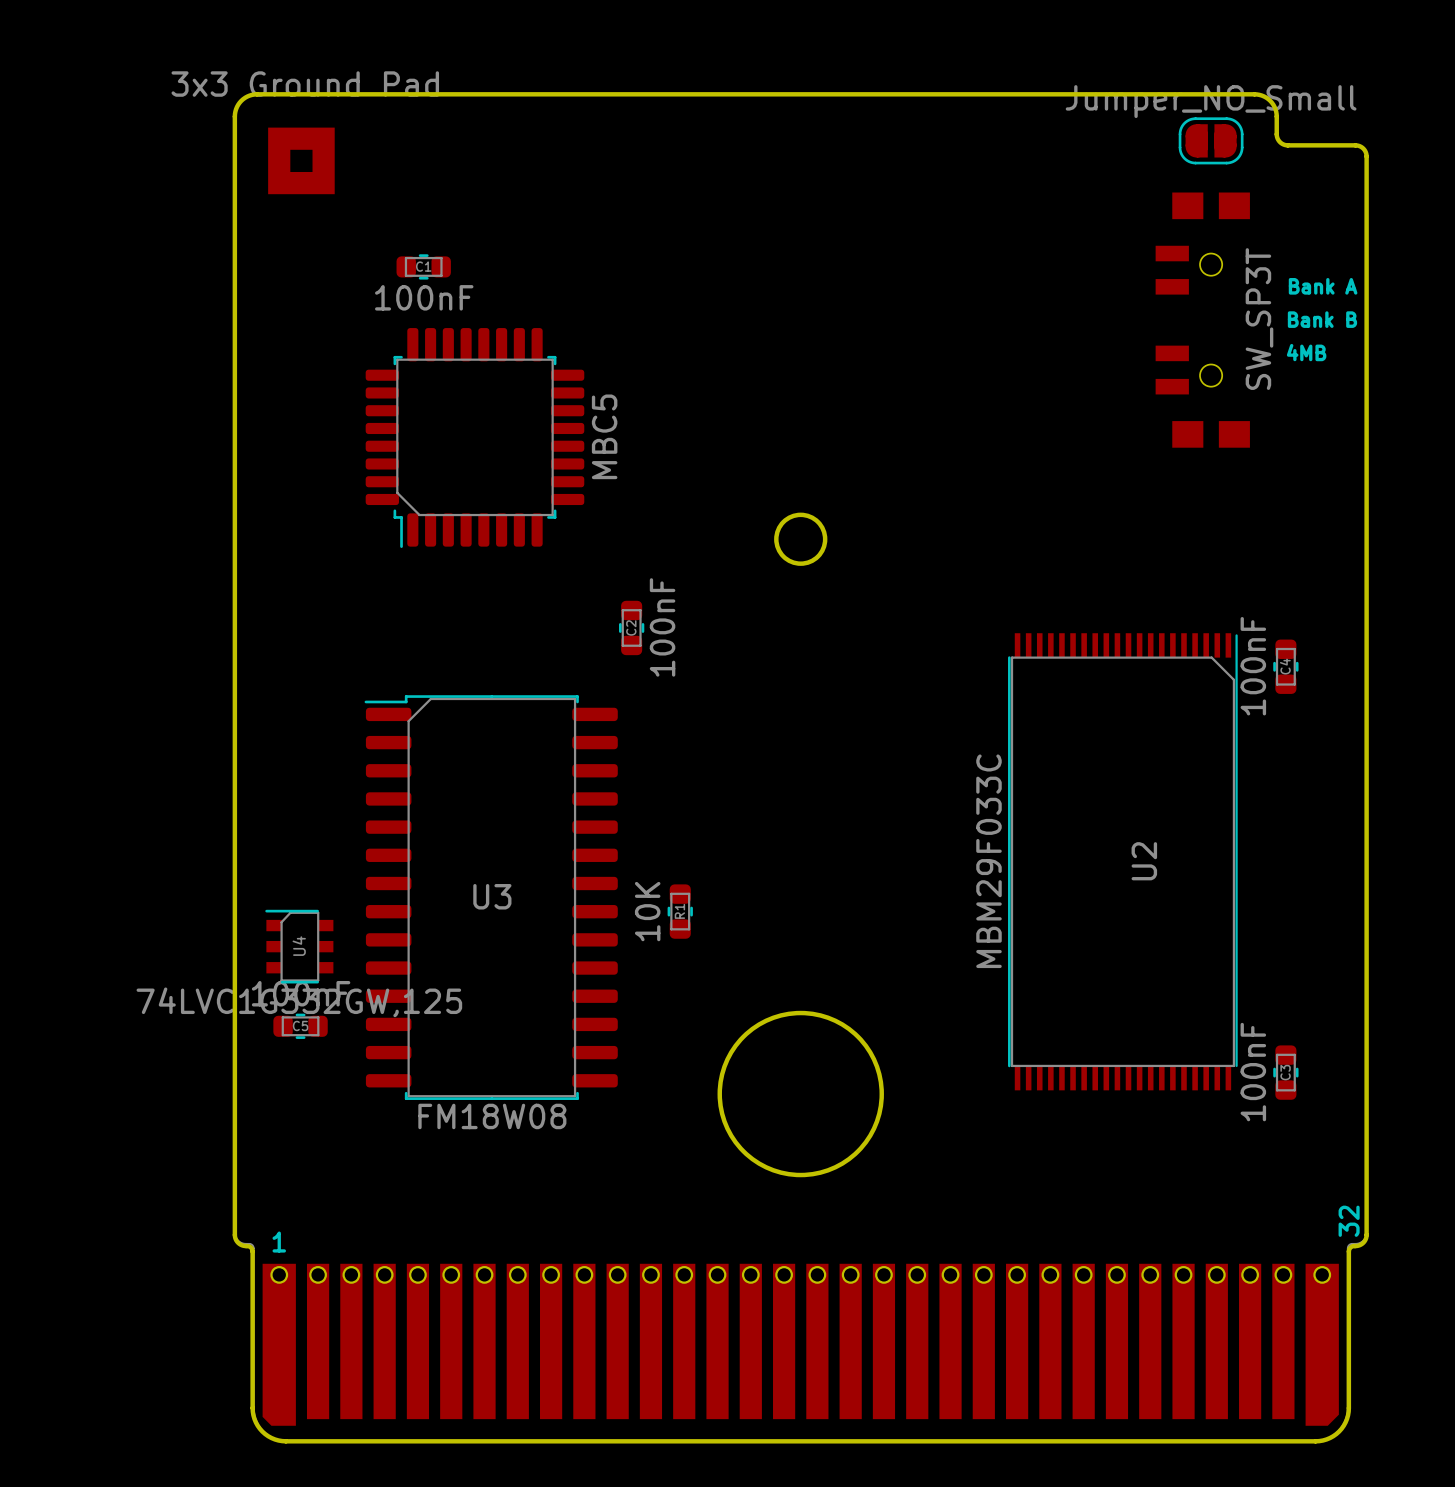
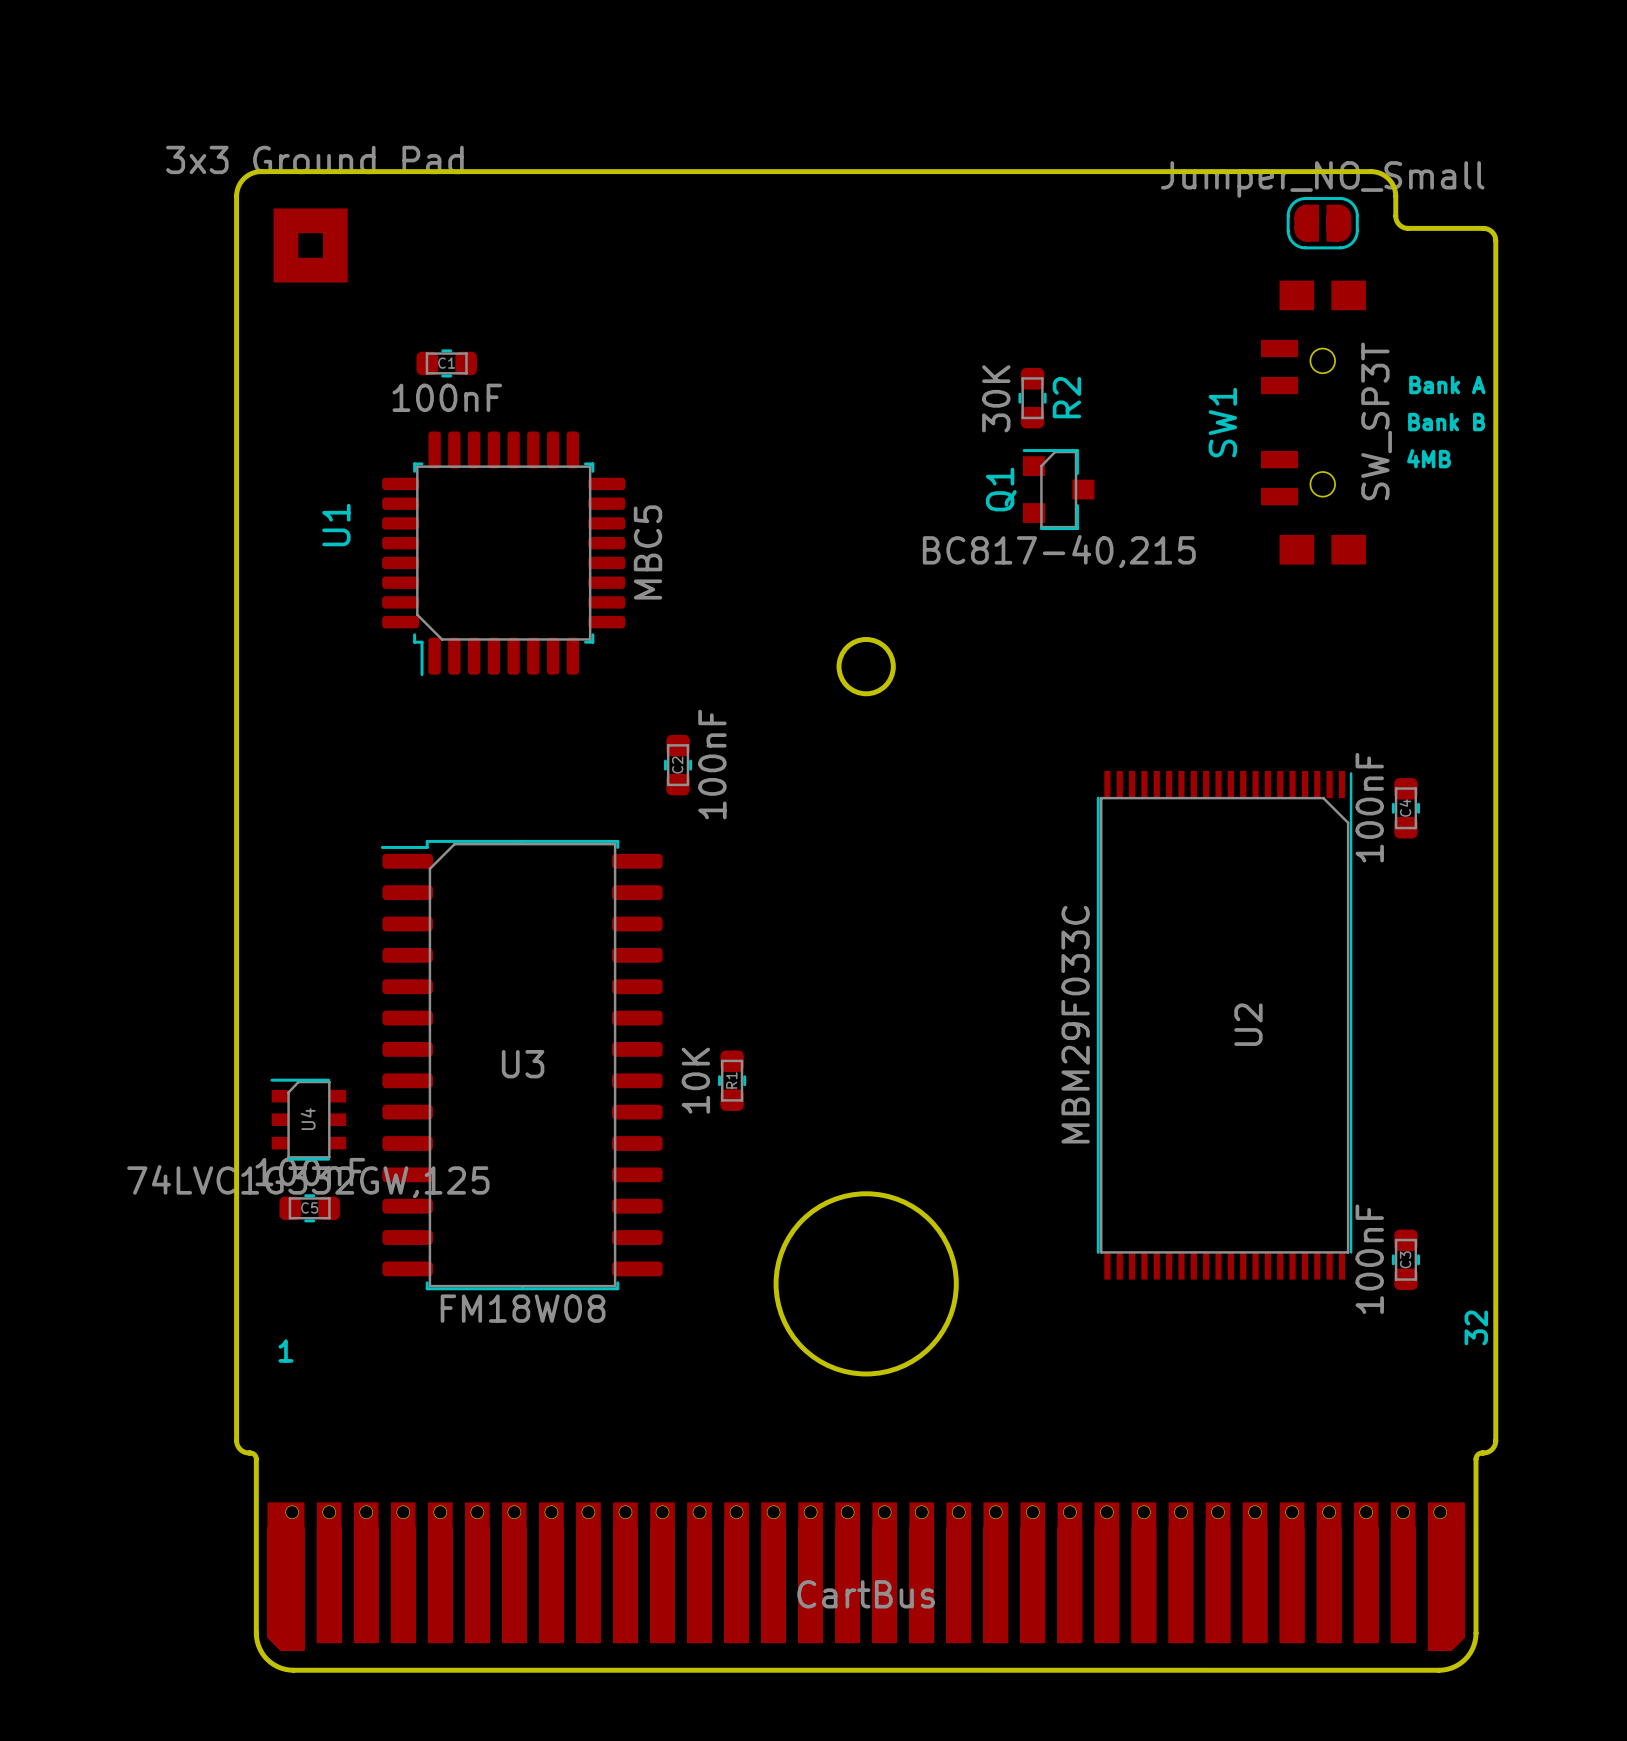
board edge: (257, 94) (1254, 94) (1266, 97) (1273, 104) (1276, 114) (1277, 137) (1282, 143) (1356, 145) (1364, 149) (1366, 156) (1366, 1234) (1363, 1242) (1351, 1246) (1348, 1250) (1348, 1411) (1345, 1422) (1336, 1434) (1326, 1439) (1315, 1441) (285, 1441) (271, 1438) (259, 1428) (254, 1419) (252, 1408) (252, 1250) (250, 1246) (238, 1242) (234, 1234) (234, 116) (236, 109) (241, 100) (249, 95) (257, 94) -> none
R2: none -> 30K (1032, 398)
SW1 name: none -> SW1 (1222, 422)
Q1: none -> BC817-40,215 (1058, 489)
U1 name: none -> U1 (336, 525)
part: none -> CartBus (866, 920)
part: (800, 1337) -> none

